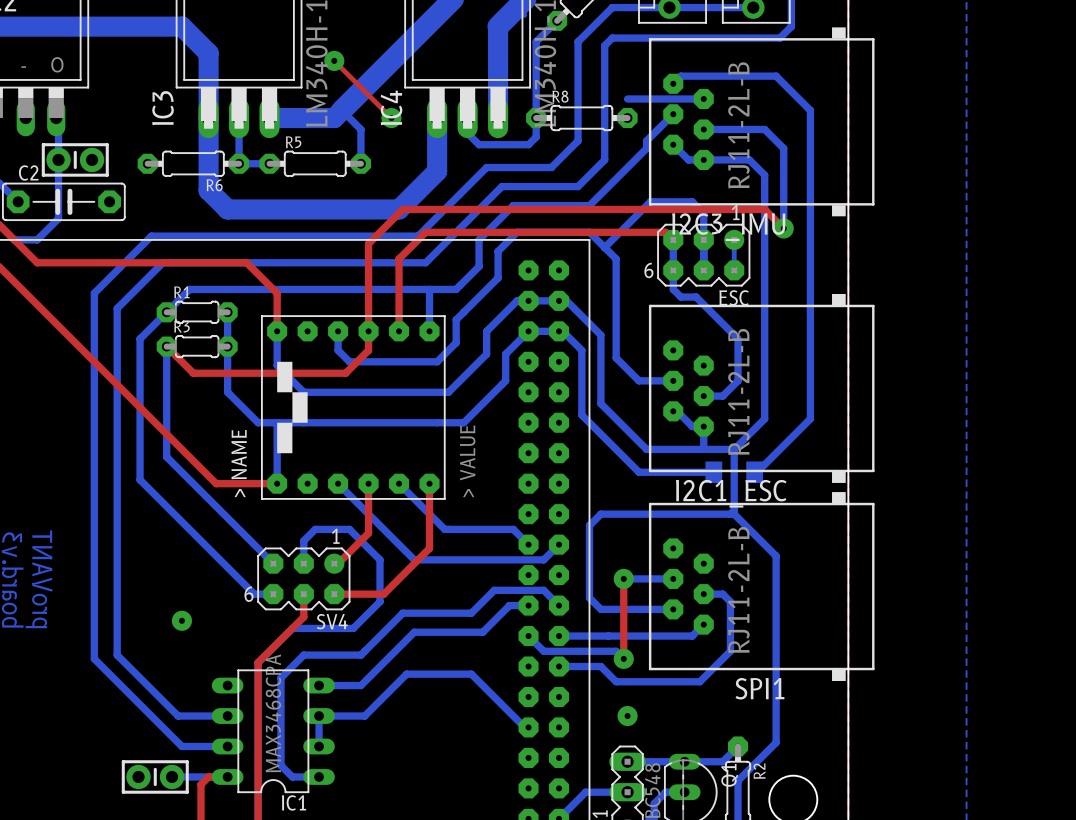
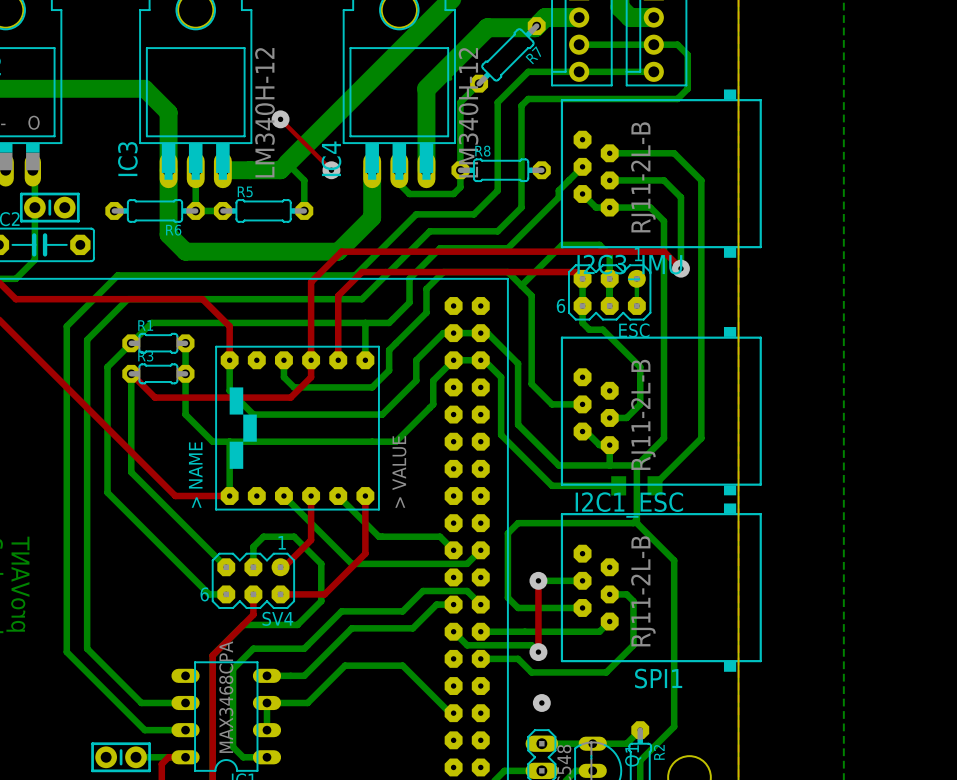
bottom track: (673, 83) (680, 76) (776, 76) (810, 110) (810, 418) (757, 472) (754, 472) -> (609, 153) (674, 153) (701, 180) (701, 438) (655, 485)
bottom track: (627, 98) (703, 98) -> none
via: (181, 620) -> none

